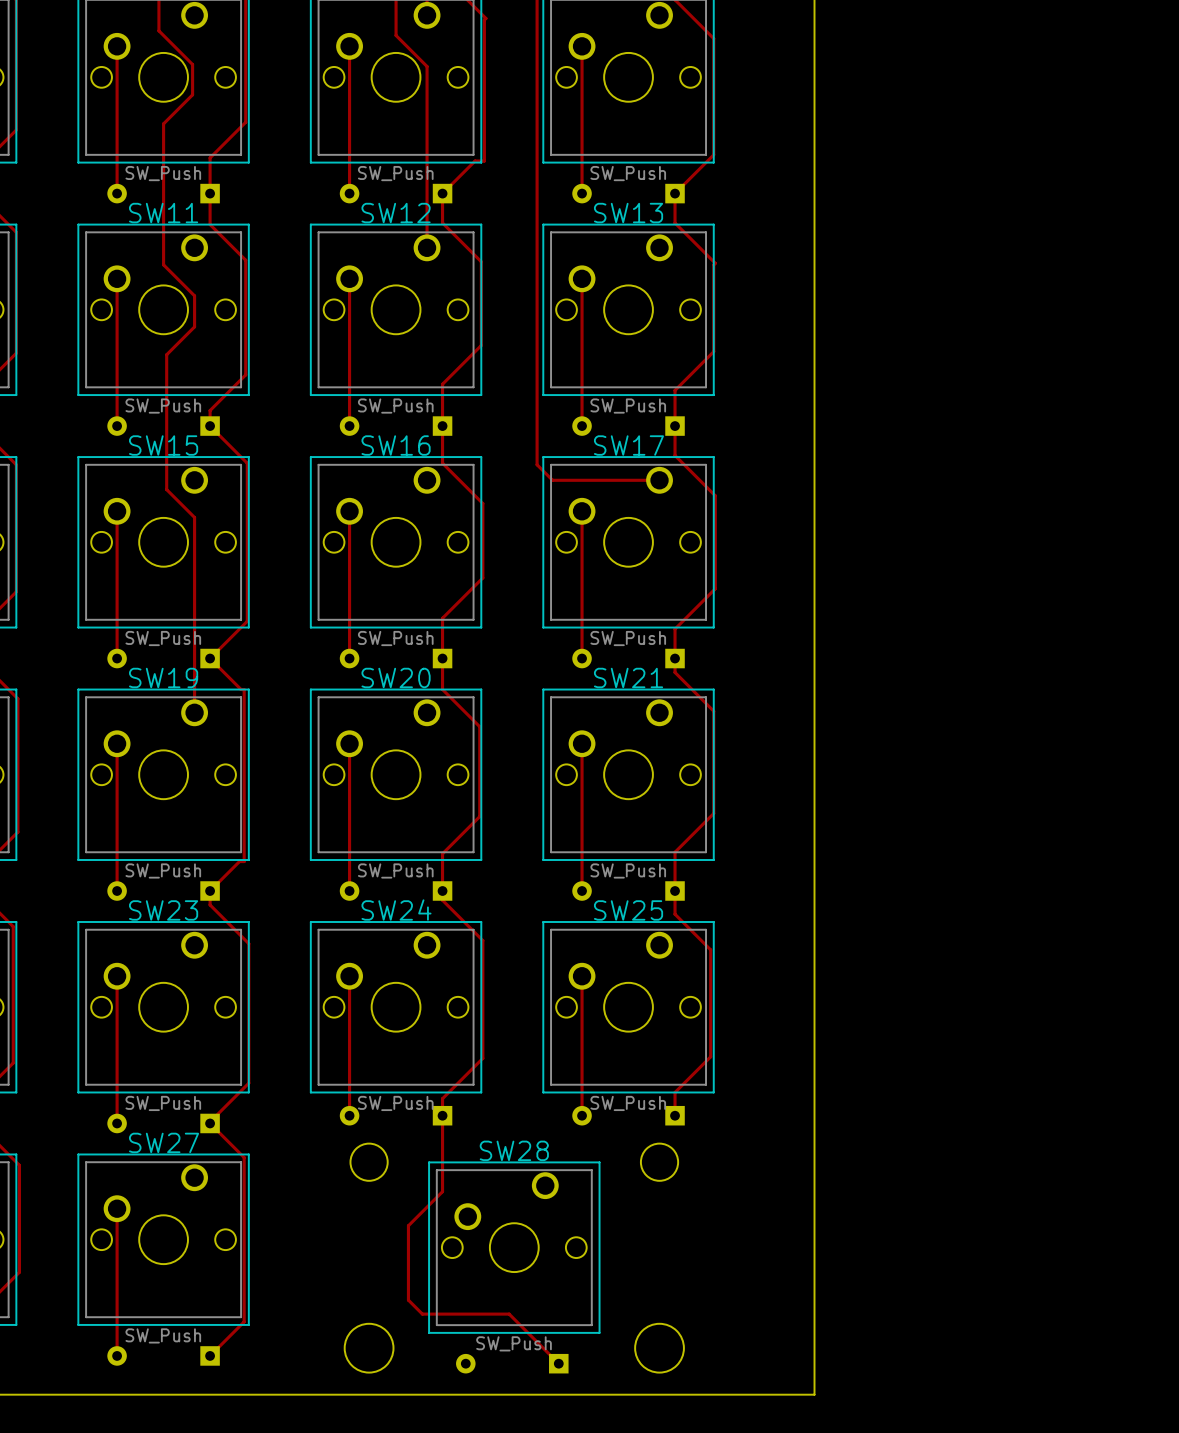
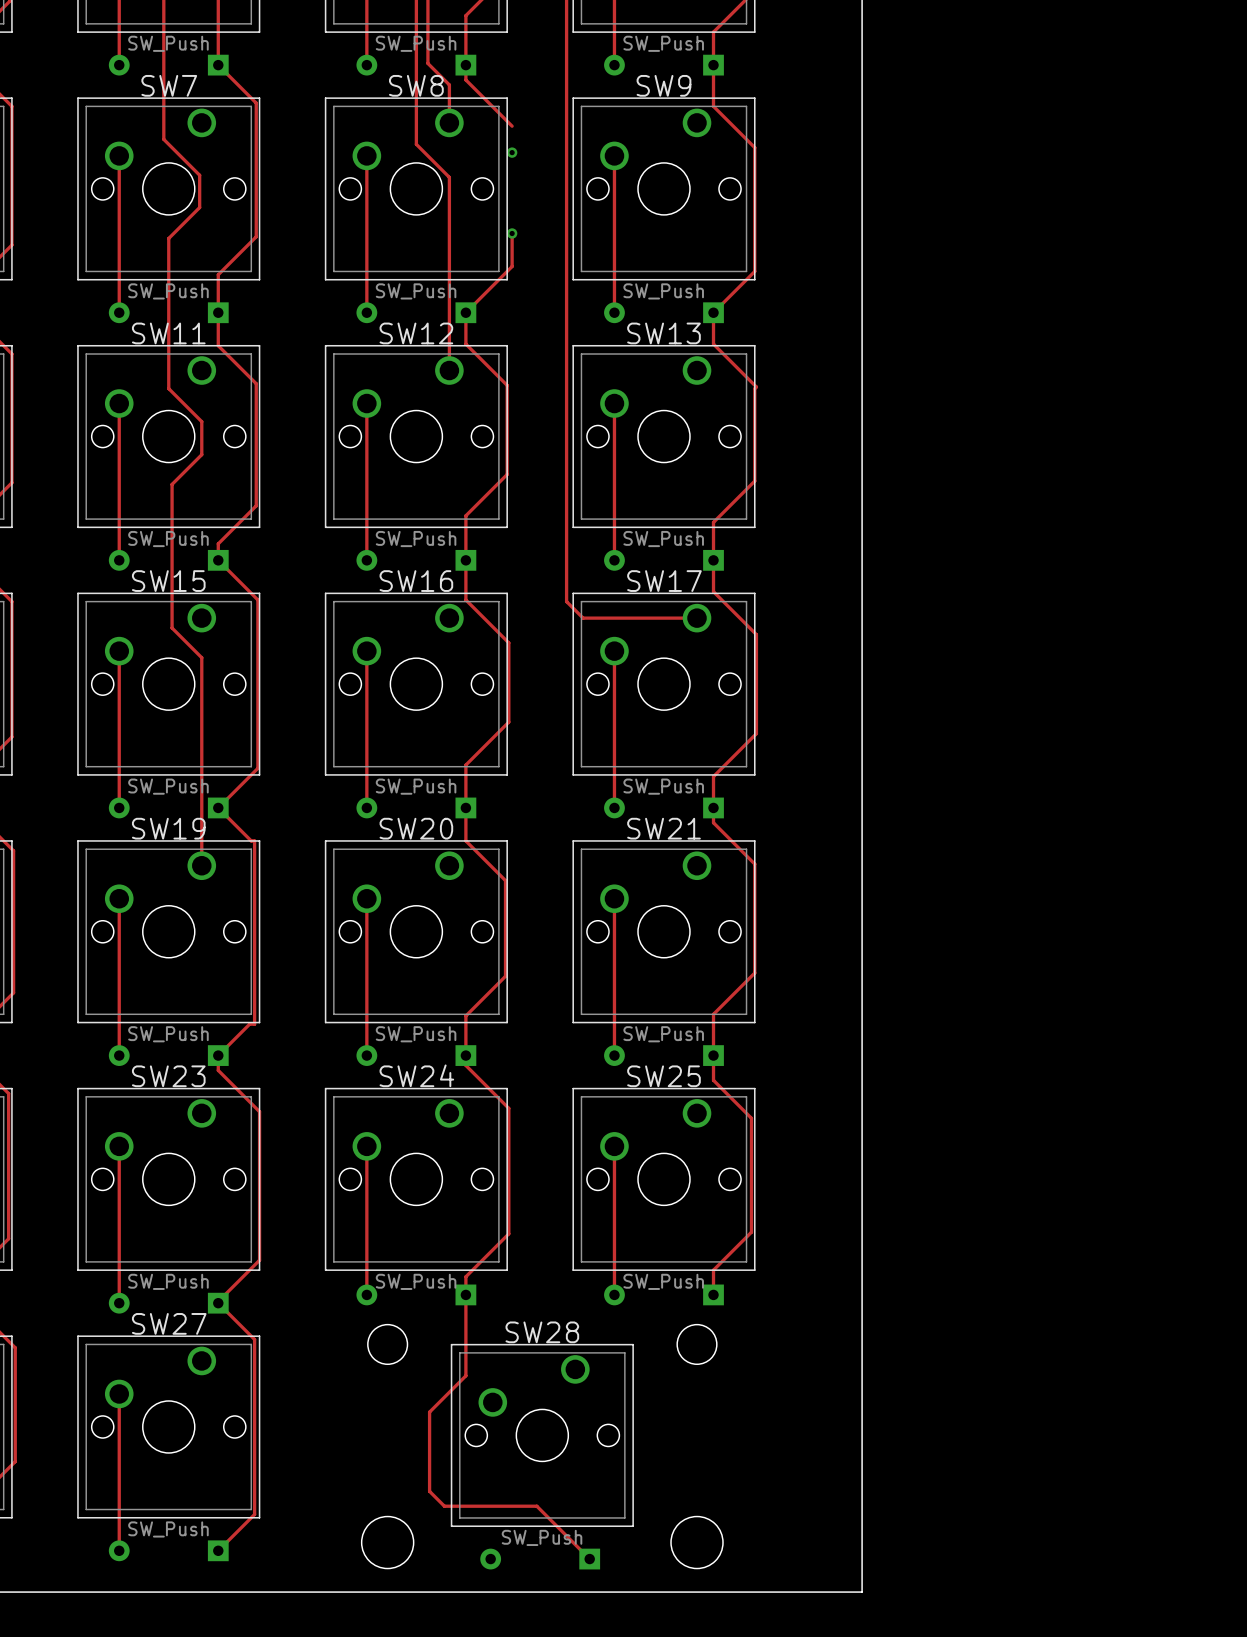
track: (485, 18) (484, 20) (484, 161) (475, 161) -> (512, 233) (512, 266) (500, 278)
via: none -> (512, 152)
via: none -> (512, 233)

